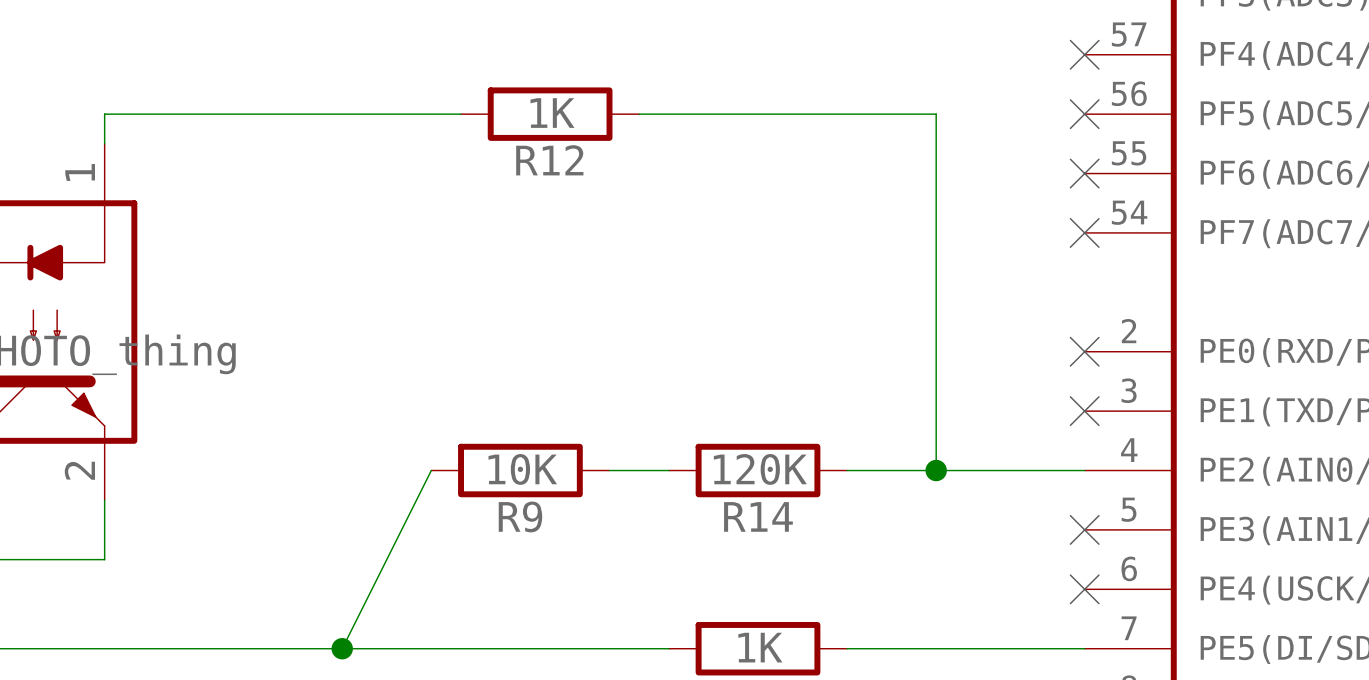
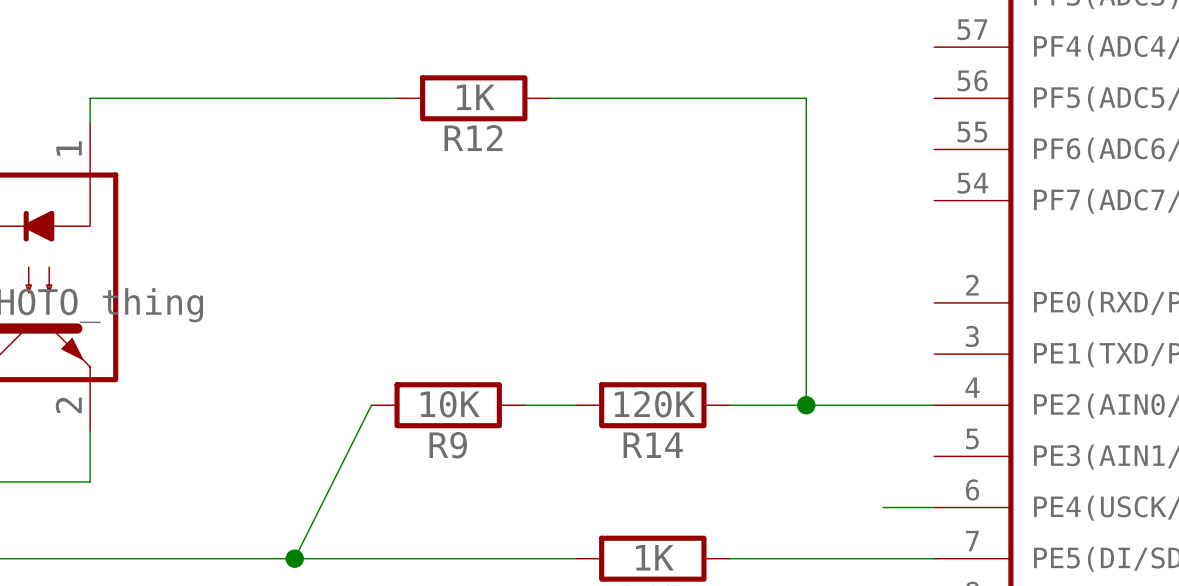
no-connect mark: (1084, 54) -> none
no-connect mark: (1084, 114) -> none
no-connect mark: (1084, 173) -> none
no-connect mark: (1084, 232) -> none
no-connect mark: (1084, 351) -> none
no-connect mark: (1084, 411) -> none
no-connect mark: (1084, 529) -> none
wire: none -> (883, 507) (934, 507)
no-connect mark: (1084, 589) -> none

